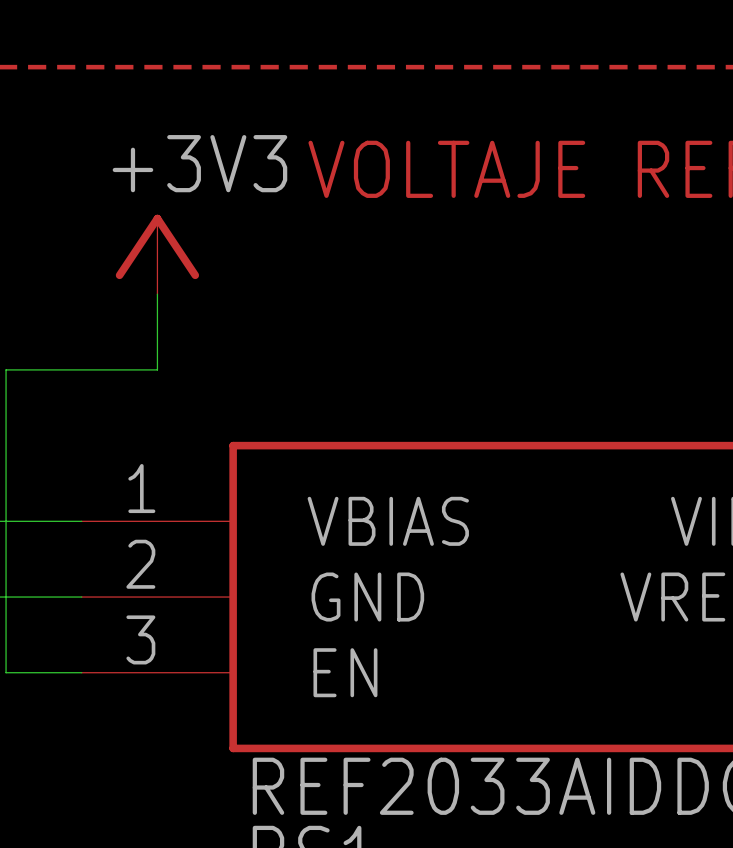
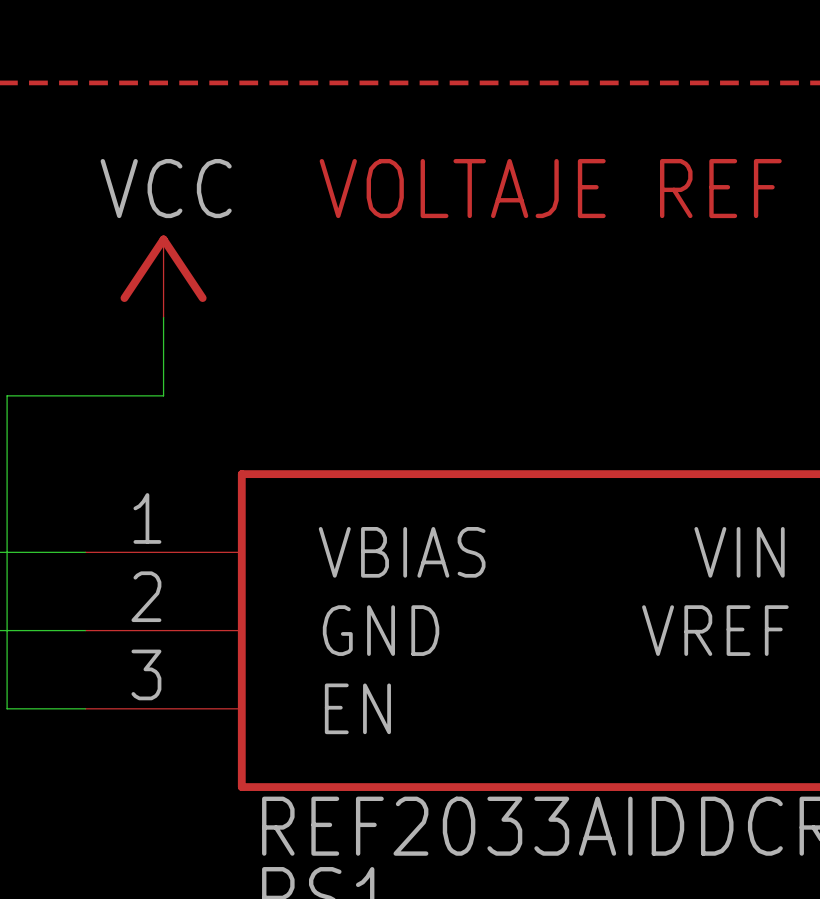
power symbol: +3V3 (157, 254) -> VCC (163, 276)

